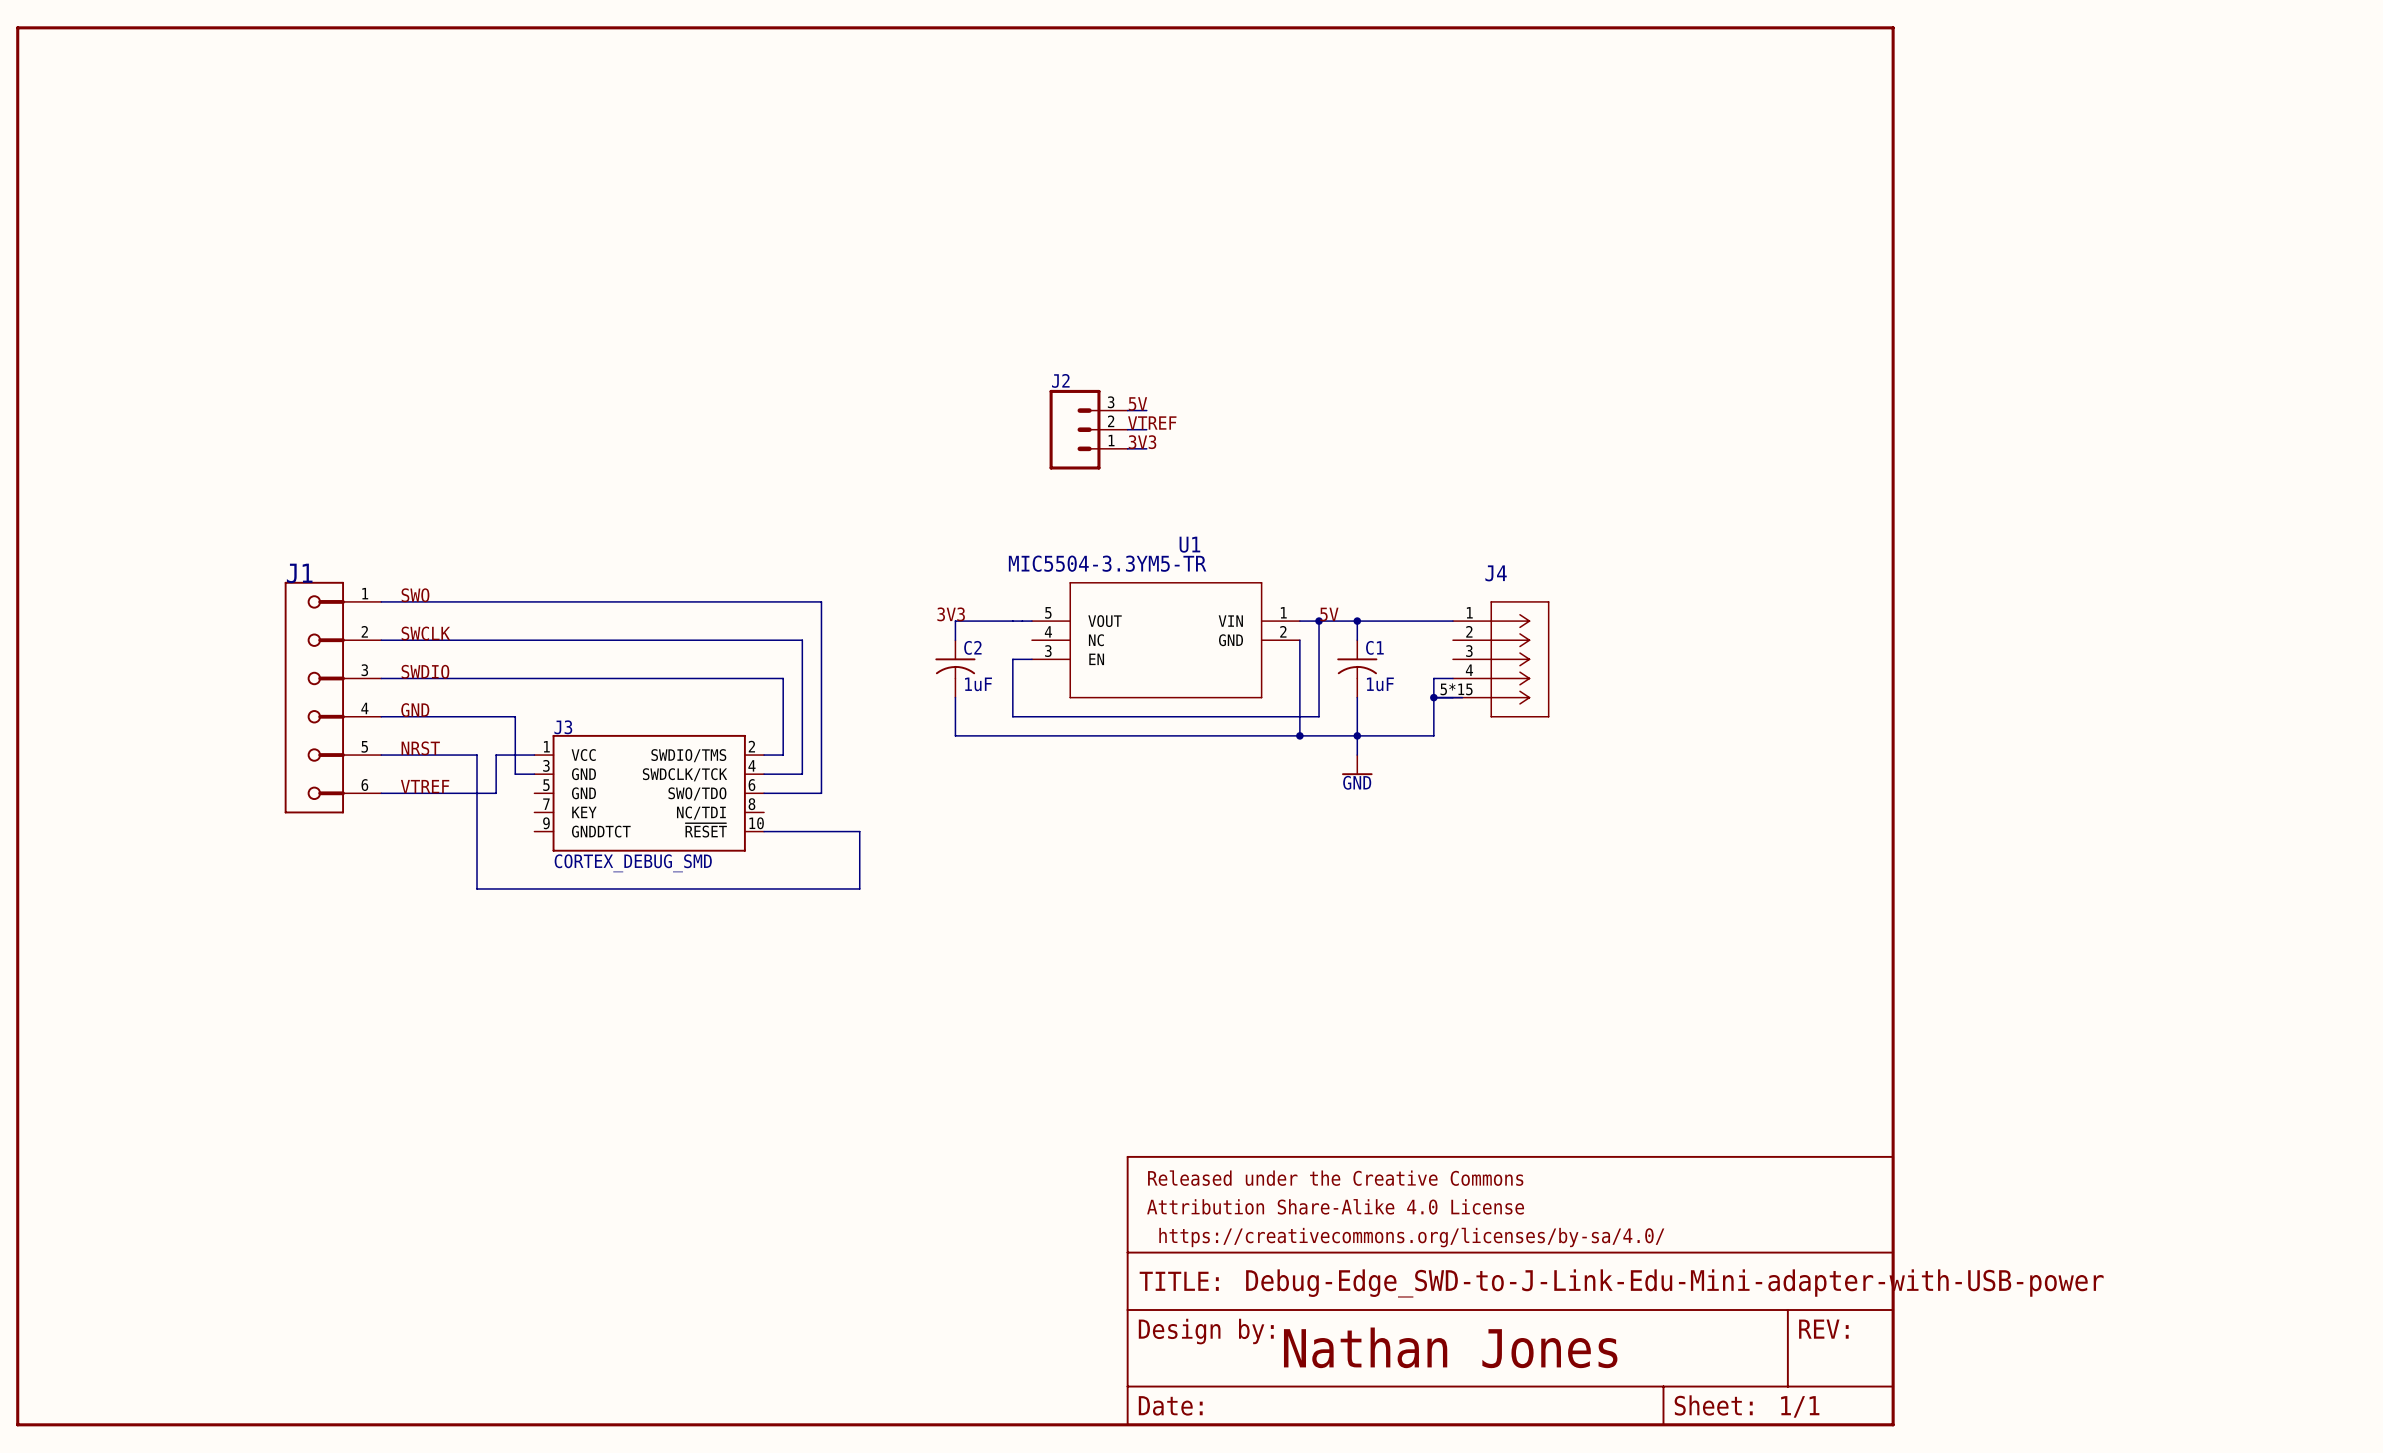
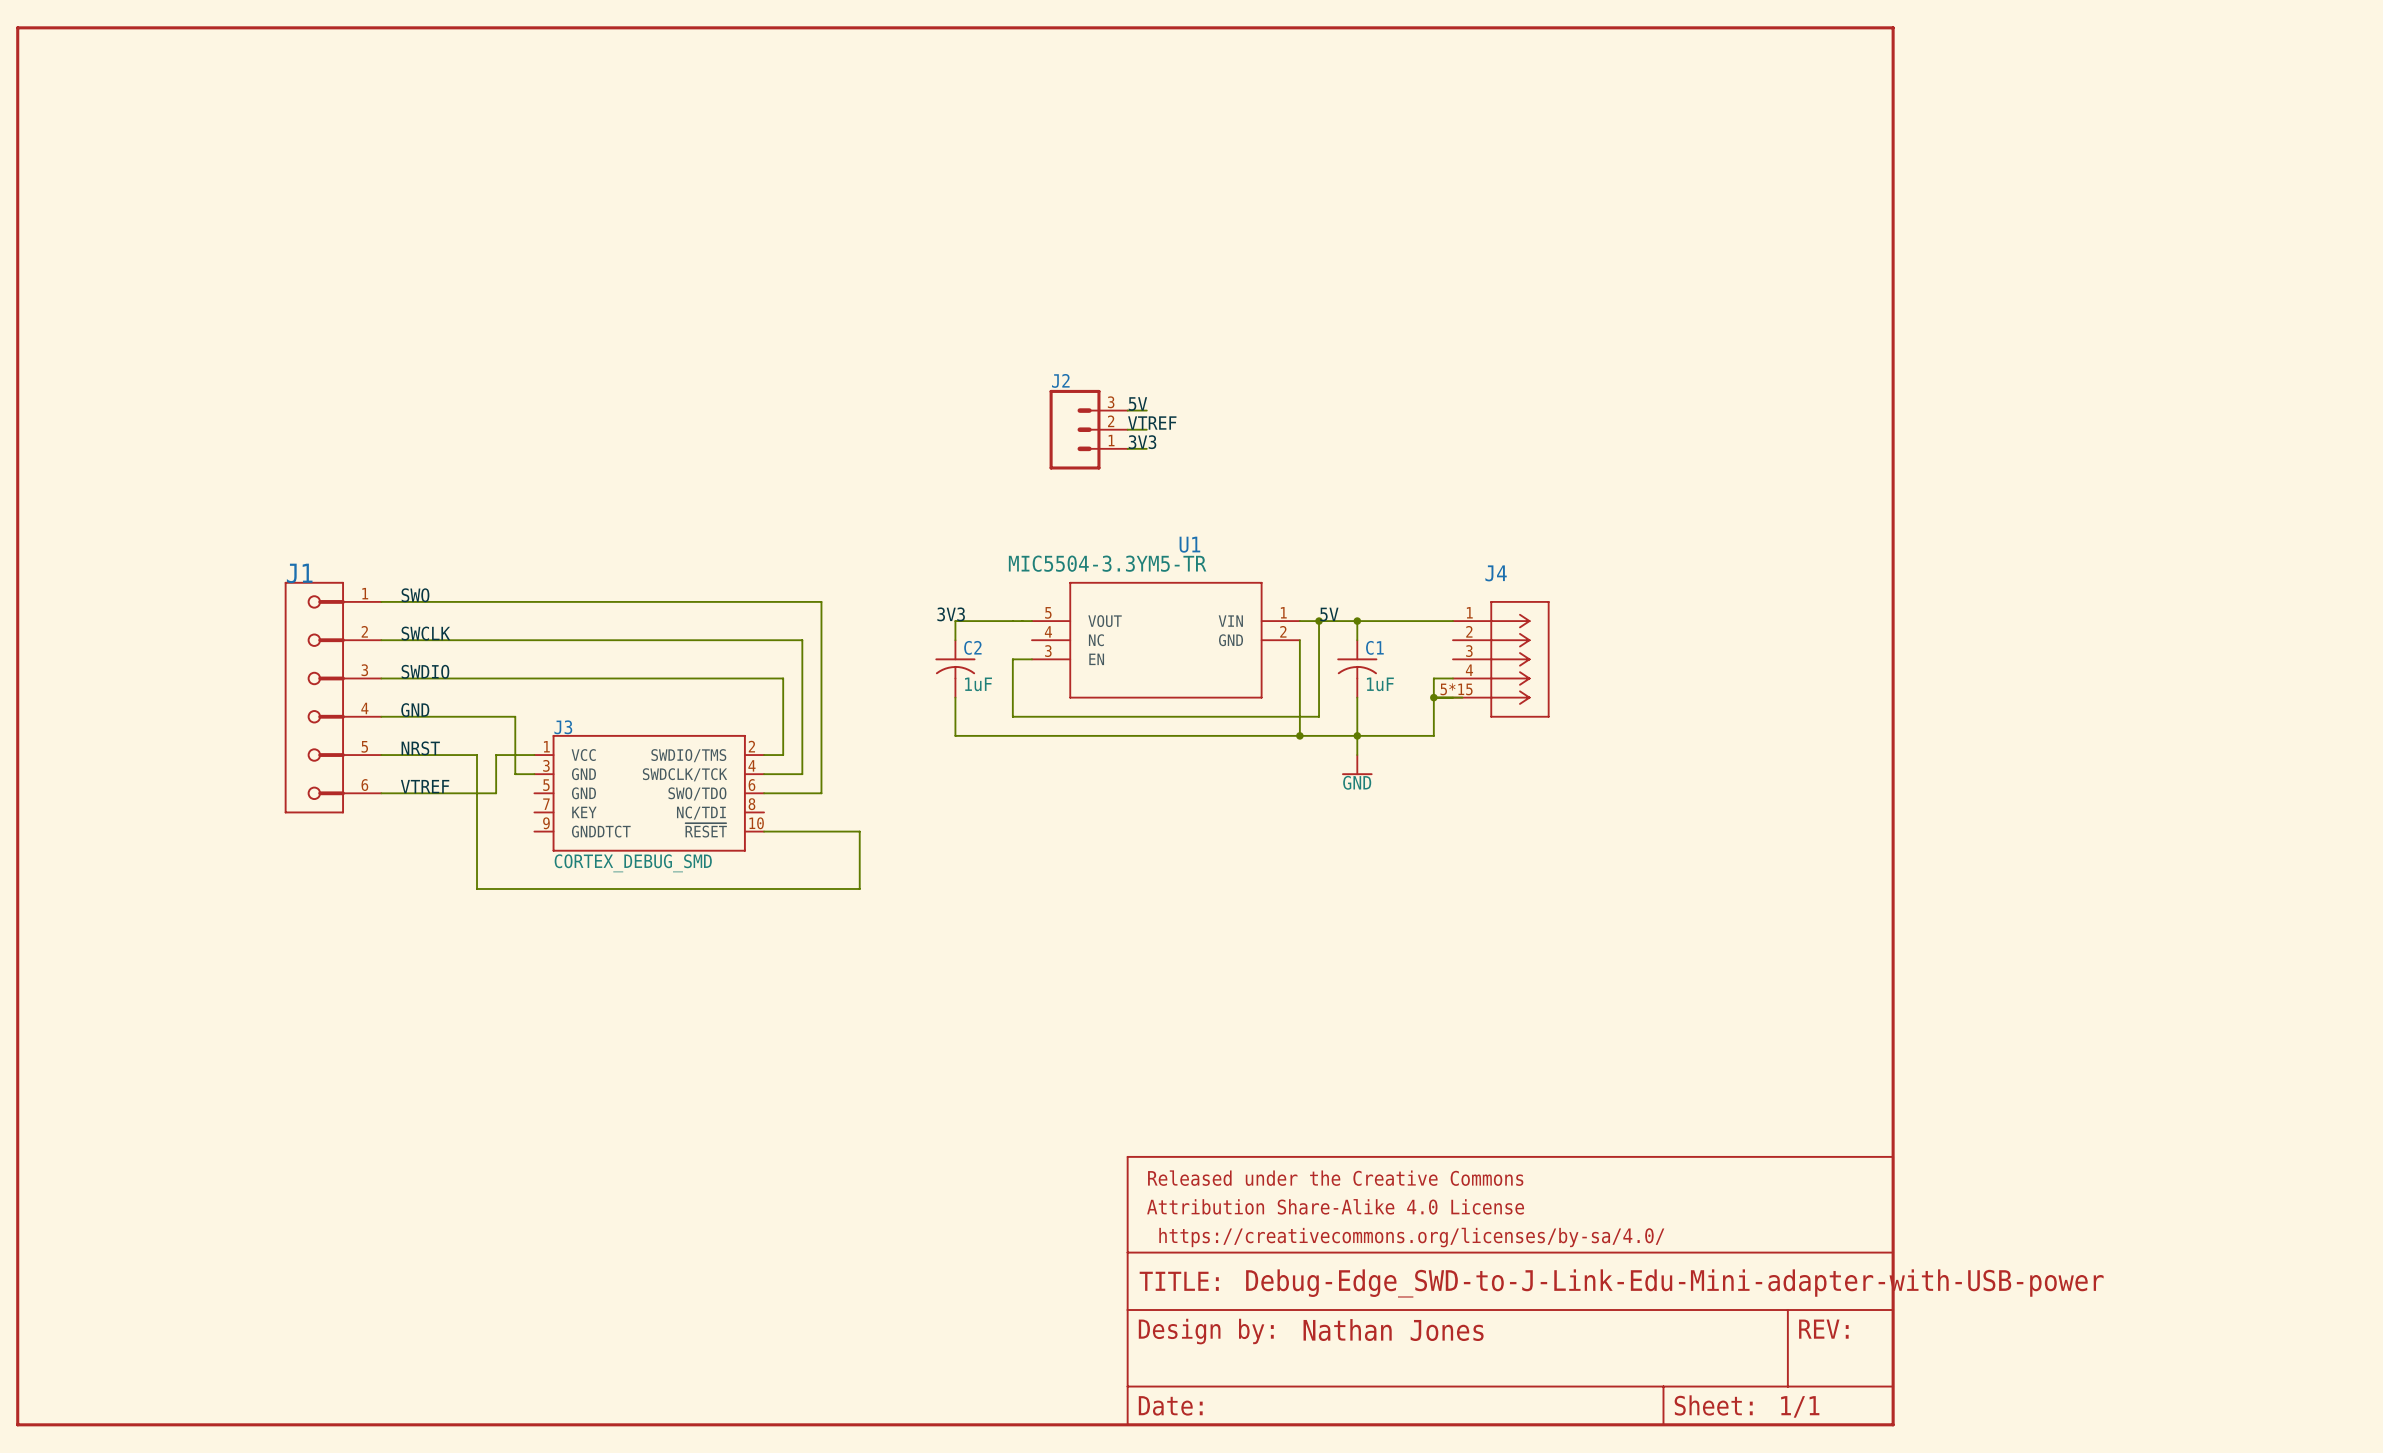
part text: none -> Nathan Jones (1393, 1330)
text: Nathan Jones (1450, 1347) -> none

